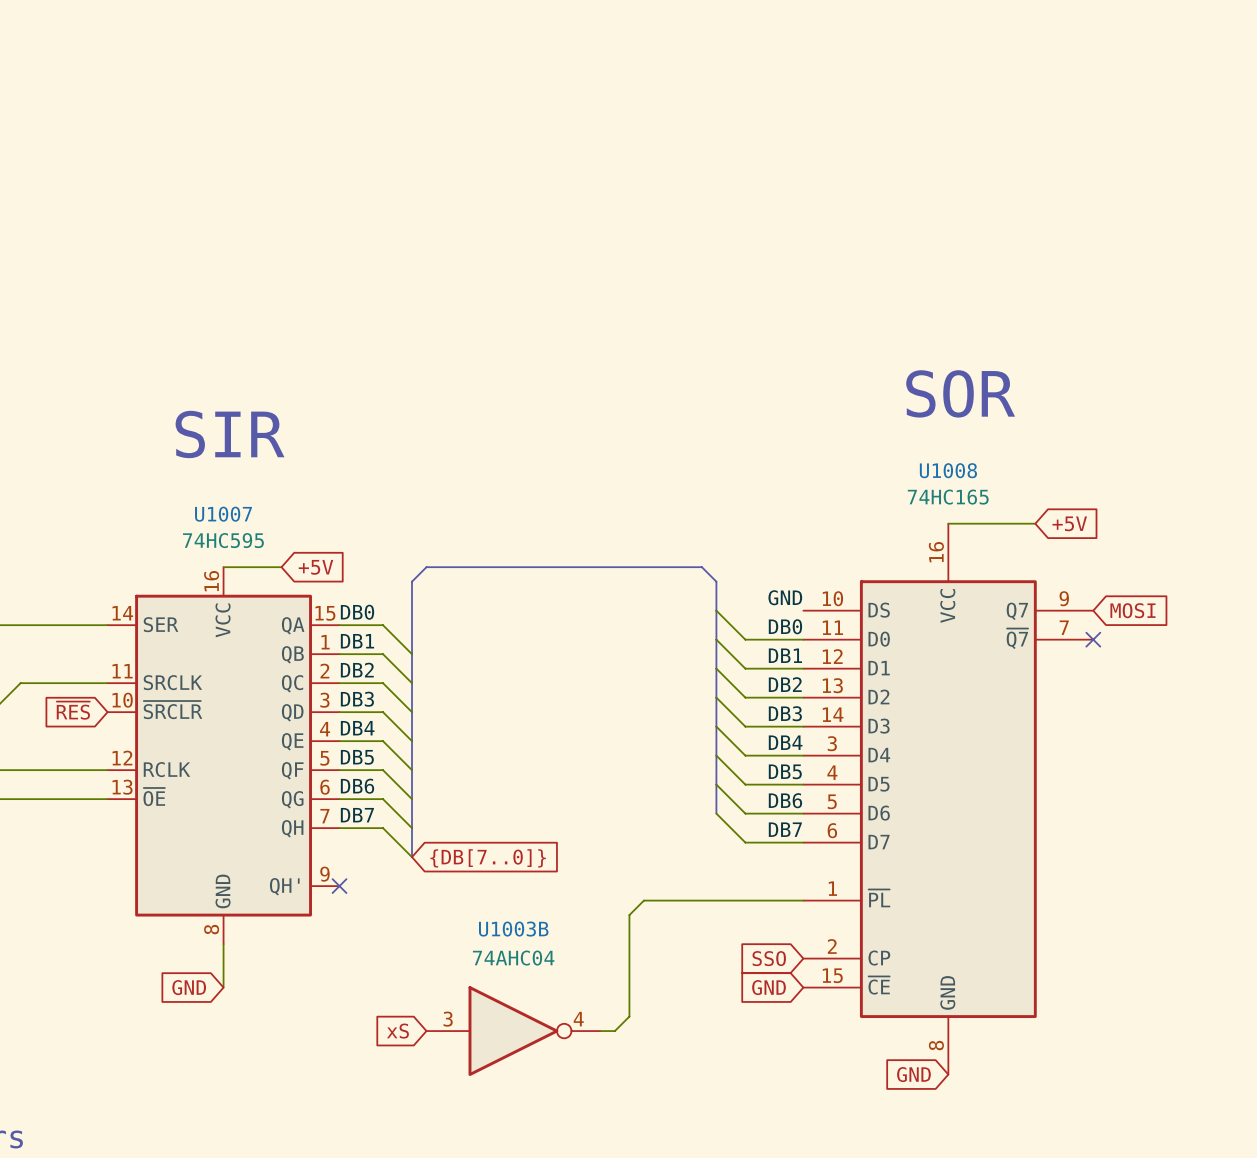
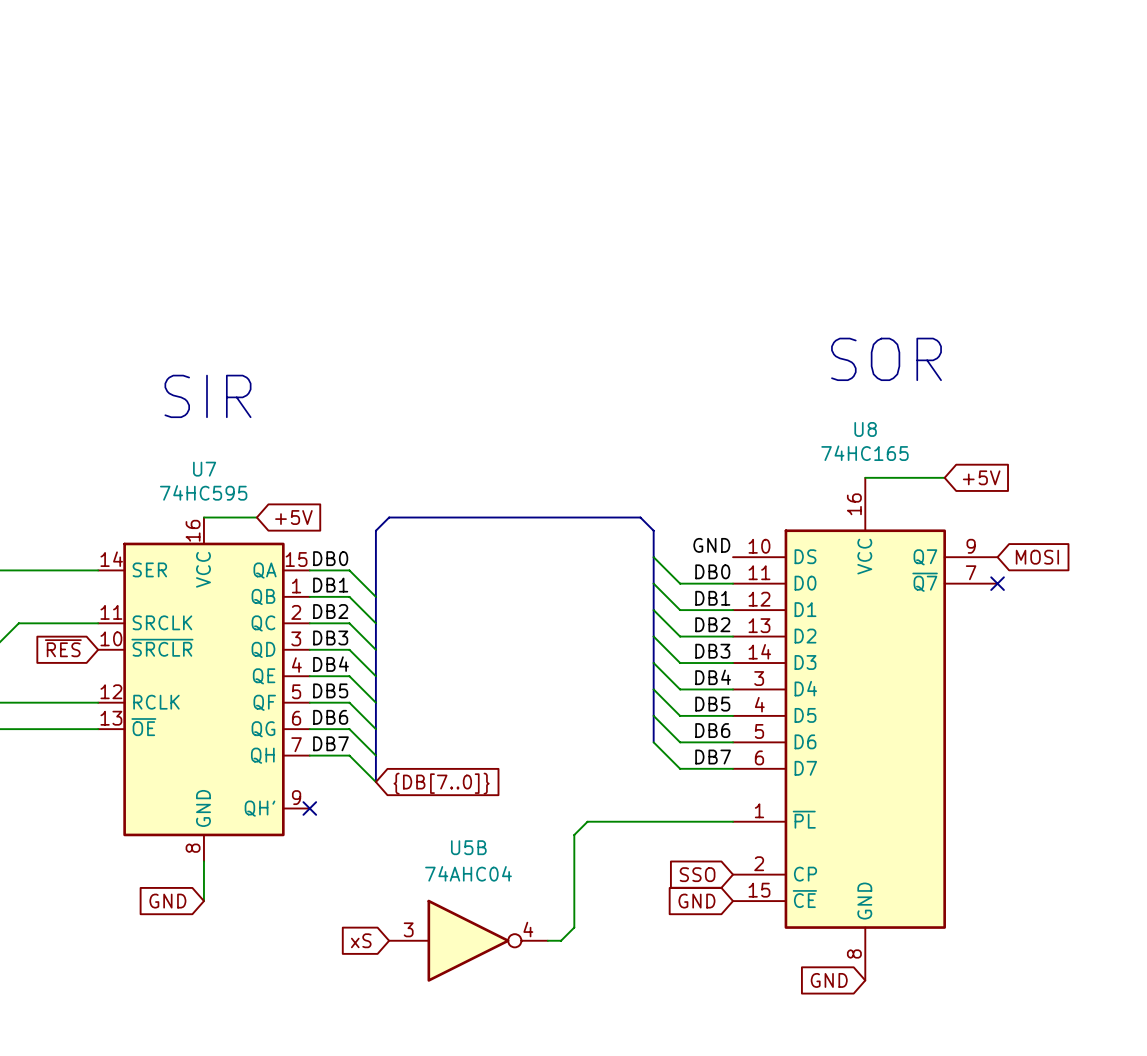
U1008 name: U1008 (948, 470) -> U8 (865, 429)
U1007 name: U1007 (223, 514) -> U7 (204, 469)
U1003B name: U1003B (513, 929) -> U5B (468, 847)

